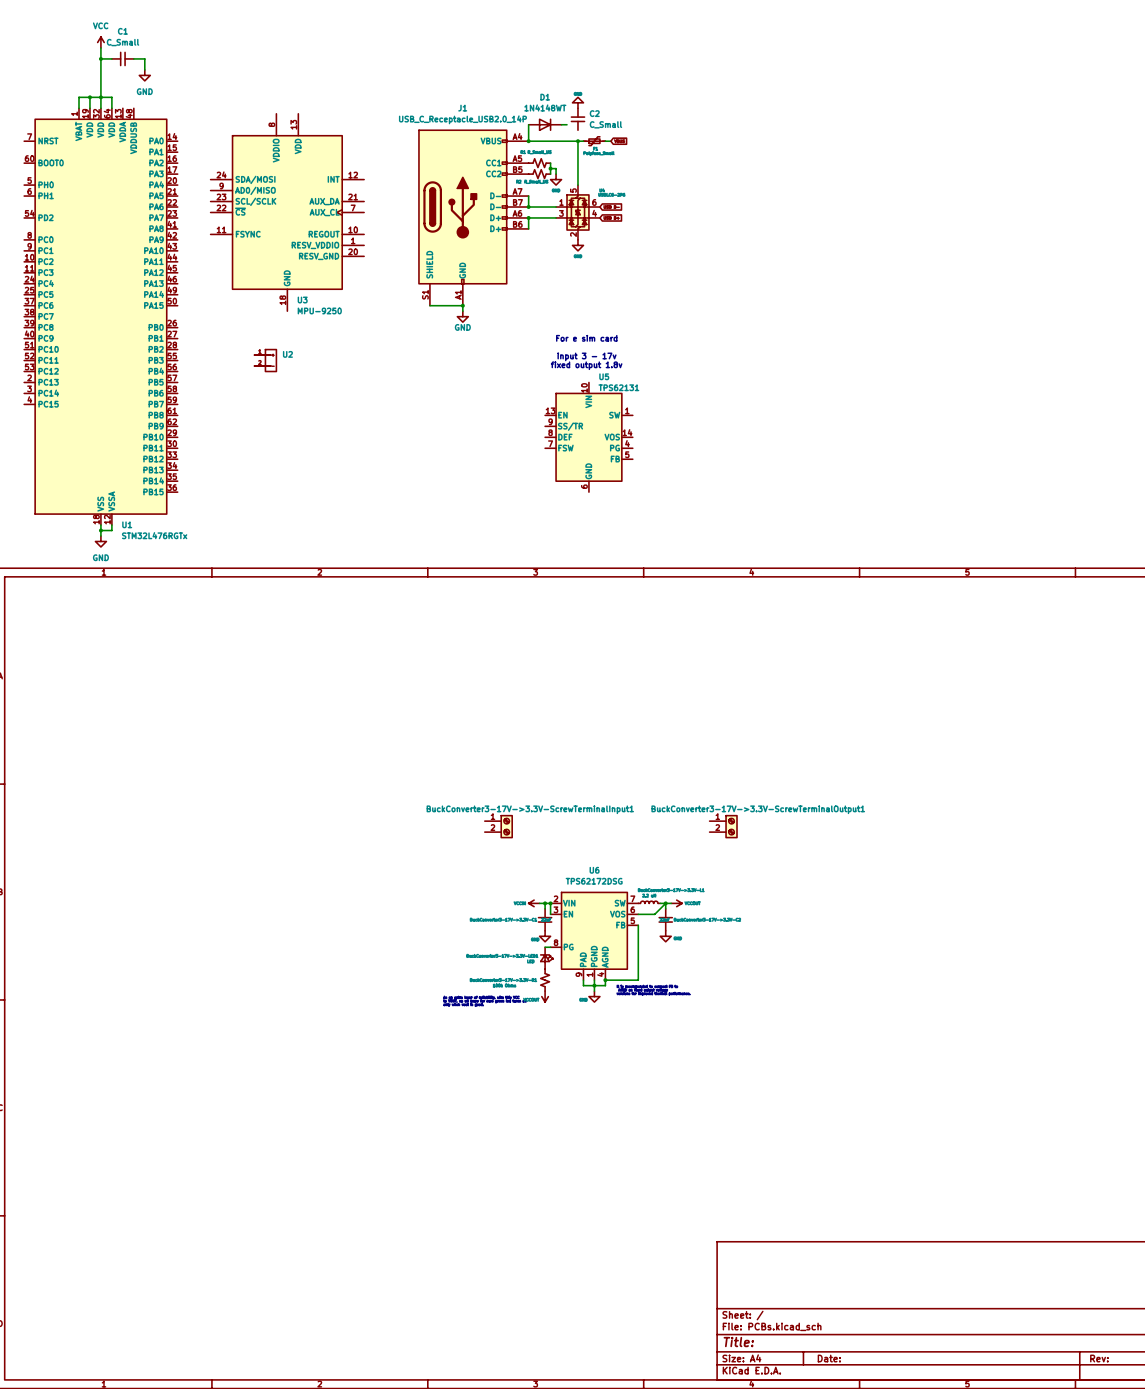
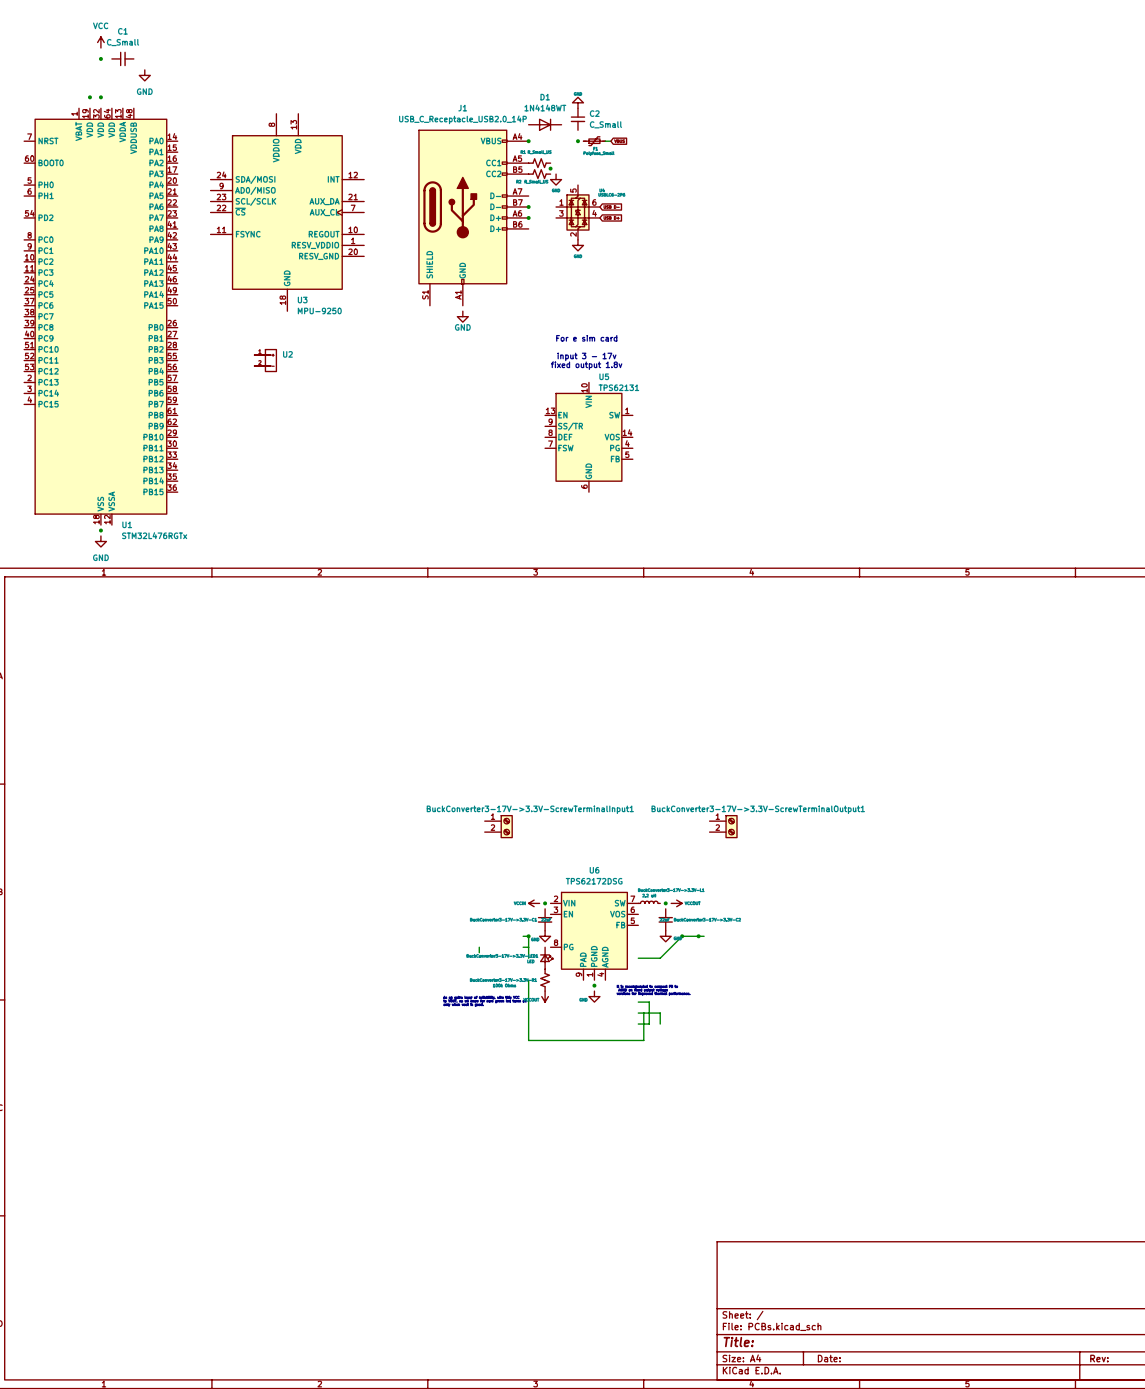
wire: (100, 47) (100, 108) -> none
wire: (100, 58) (111, 58) -> none
wire: (133, 58) (144, 58) (144, 69) -> none
wire: (89, 97) (89, 108) -> none
wire: (79, 108) (79, 97) (111, 97) (111, 108) -> none
wire: (528, 124) (528, 141) (583, 141) -> none
wire: (561, 124) (567, 124) -> none
wire: (577, 141) (577, 185) -> none
wire: (550, 163) (550, 174) -> none
wire: (550, 168) (556, 168) (556, 174) -> none
wire: (528, 196) (528, 207) (556, 207) -> none
wire: (556, 217) (528, 217) (528, 228) -> none
wire: (429, 305) (462, 305) (462, 311) -> none
junction: (462, 305) -> none
wire: (100, 525) (100, 536) -> none
wire: (111, 525) (111, 530) (100, 530) -> none
wire: (539, 903) (550, 903) (550, 914) -> none
wire: (545, 903) (545, 908) -> (479, 947) (479, 952)
junction: (550, 903) -> none
wire: (660, 903) (671, 903) -> none
wire: (665, 908) (665, 903) (654, 914) (638, 914) -> none
wire: (638, 925) (638, 980) (605, 980) (605, 985) (583, 985) (583, 980) -> none
wire: none -> (523, 936) (528, 936) (528, 958)
junction: none -> (528, 936)
junction: none -> (682, 936)
junction: none -> (698, 936)
wire: none -> (704, 936) (682, 936) (660, 958) (638, 958)
wire: (545, 947) (550, 947) -> (523, 947) (528, 947)
wire: none -> (528, 980) (528, 1040) (643, 1040) (643, 1013)
wire: (594, 980) (594, 991) -> none
junction: (605, 980) -> none
wire: none -> (638, 1002) (649, 1002) (649, 1024) (638, 1024)
wire: none -> (638, 1013) (660, 1013) (660, 1024)

